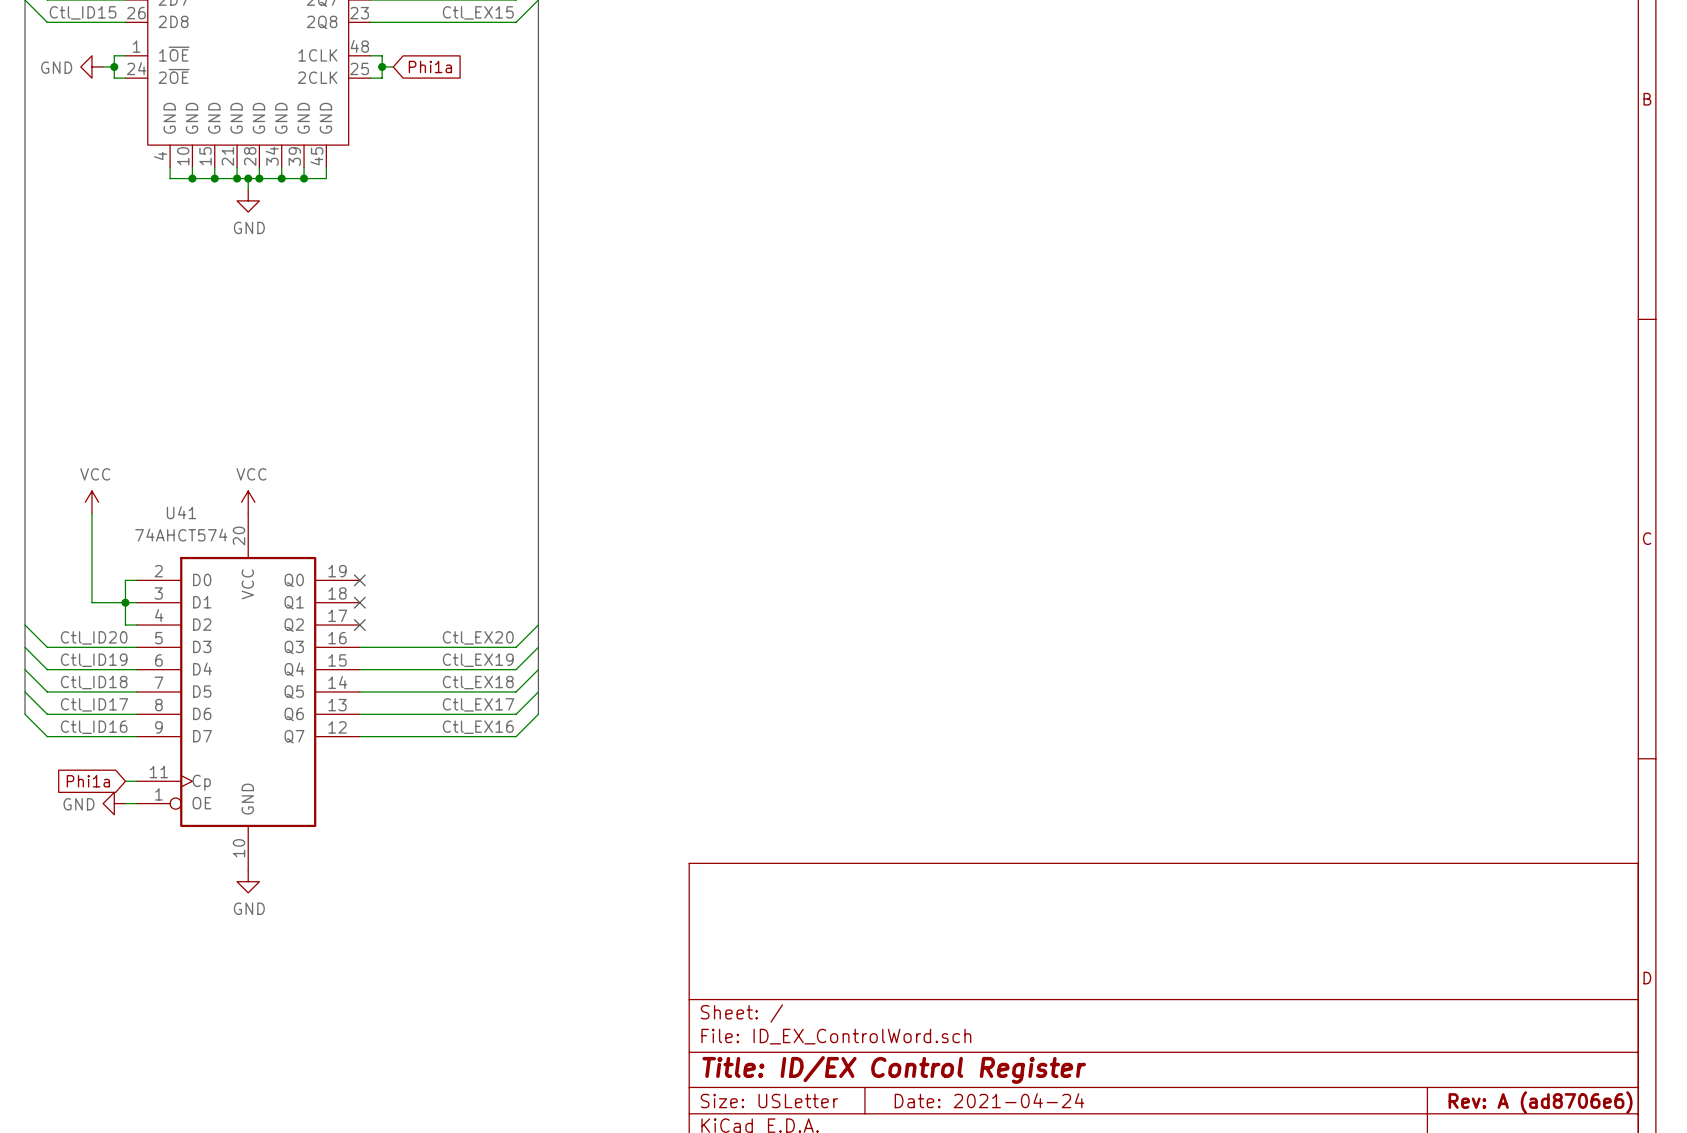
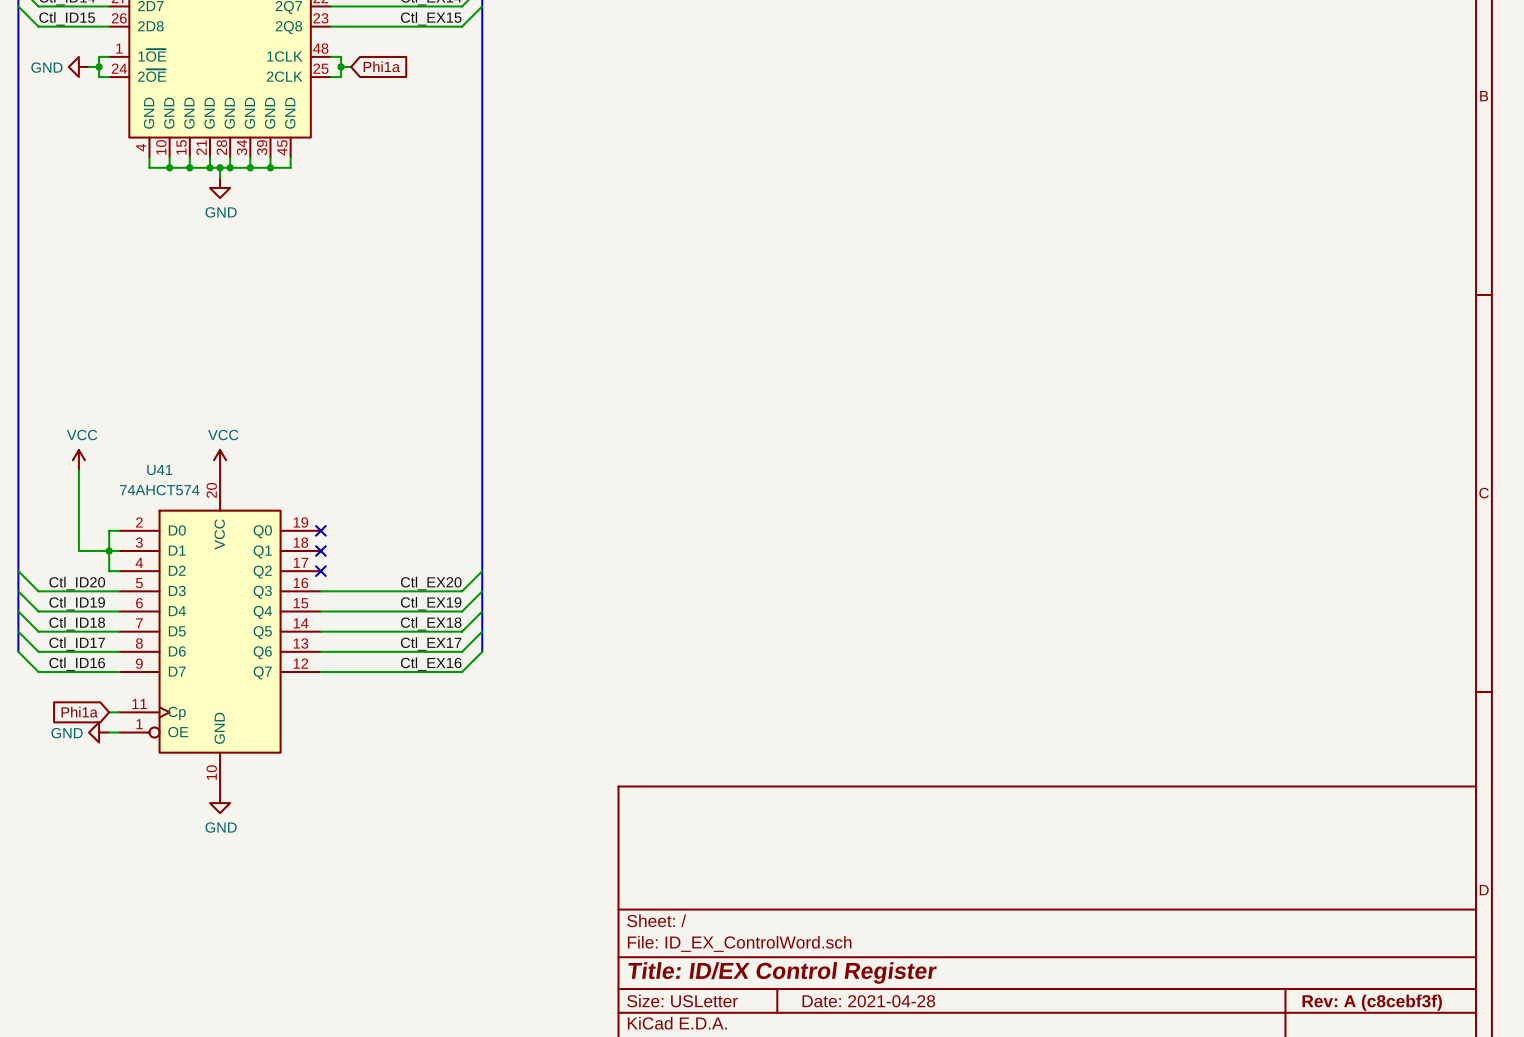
title block: Date: 2021-04-24 (989, 1100) -> Date: 2021-04-28 (868, 1001)
title block: Rev: A (ad8706e6) (1540, 1102) -> Rev: A (c8cebf3f) (1372, 1002)

